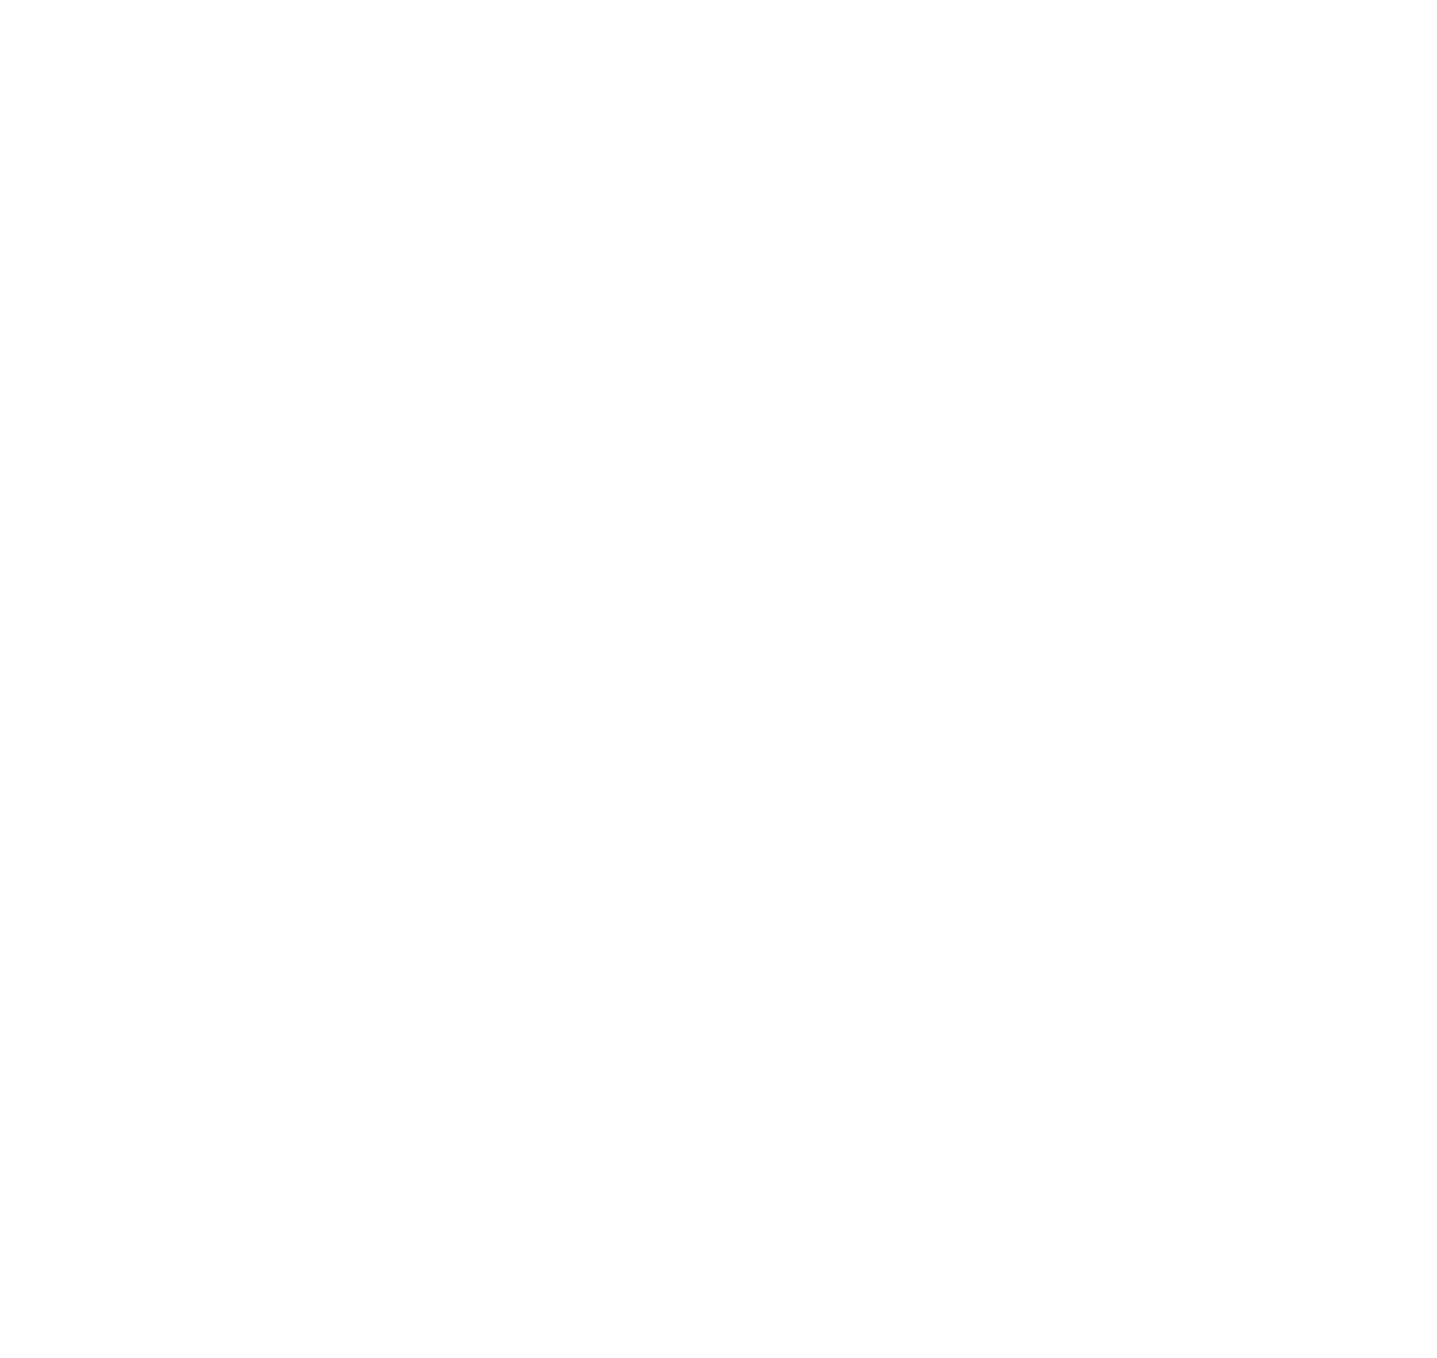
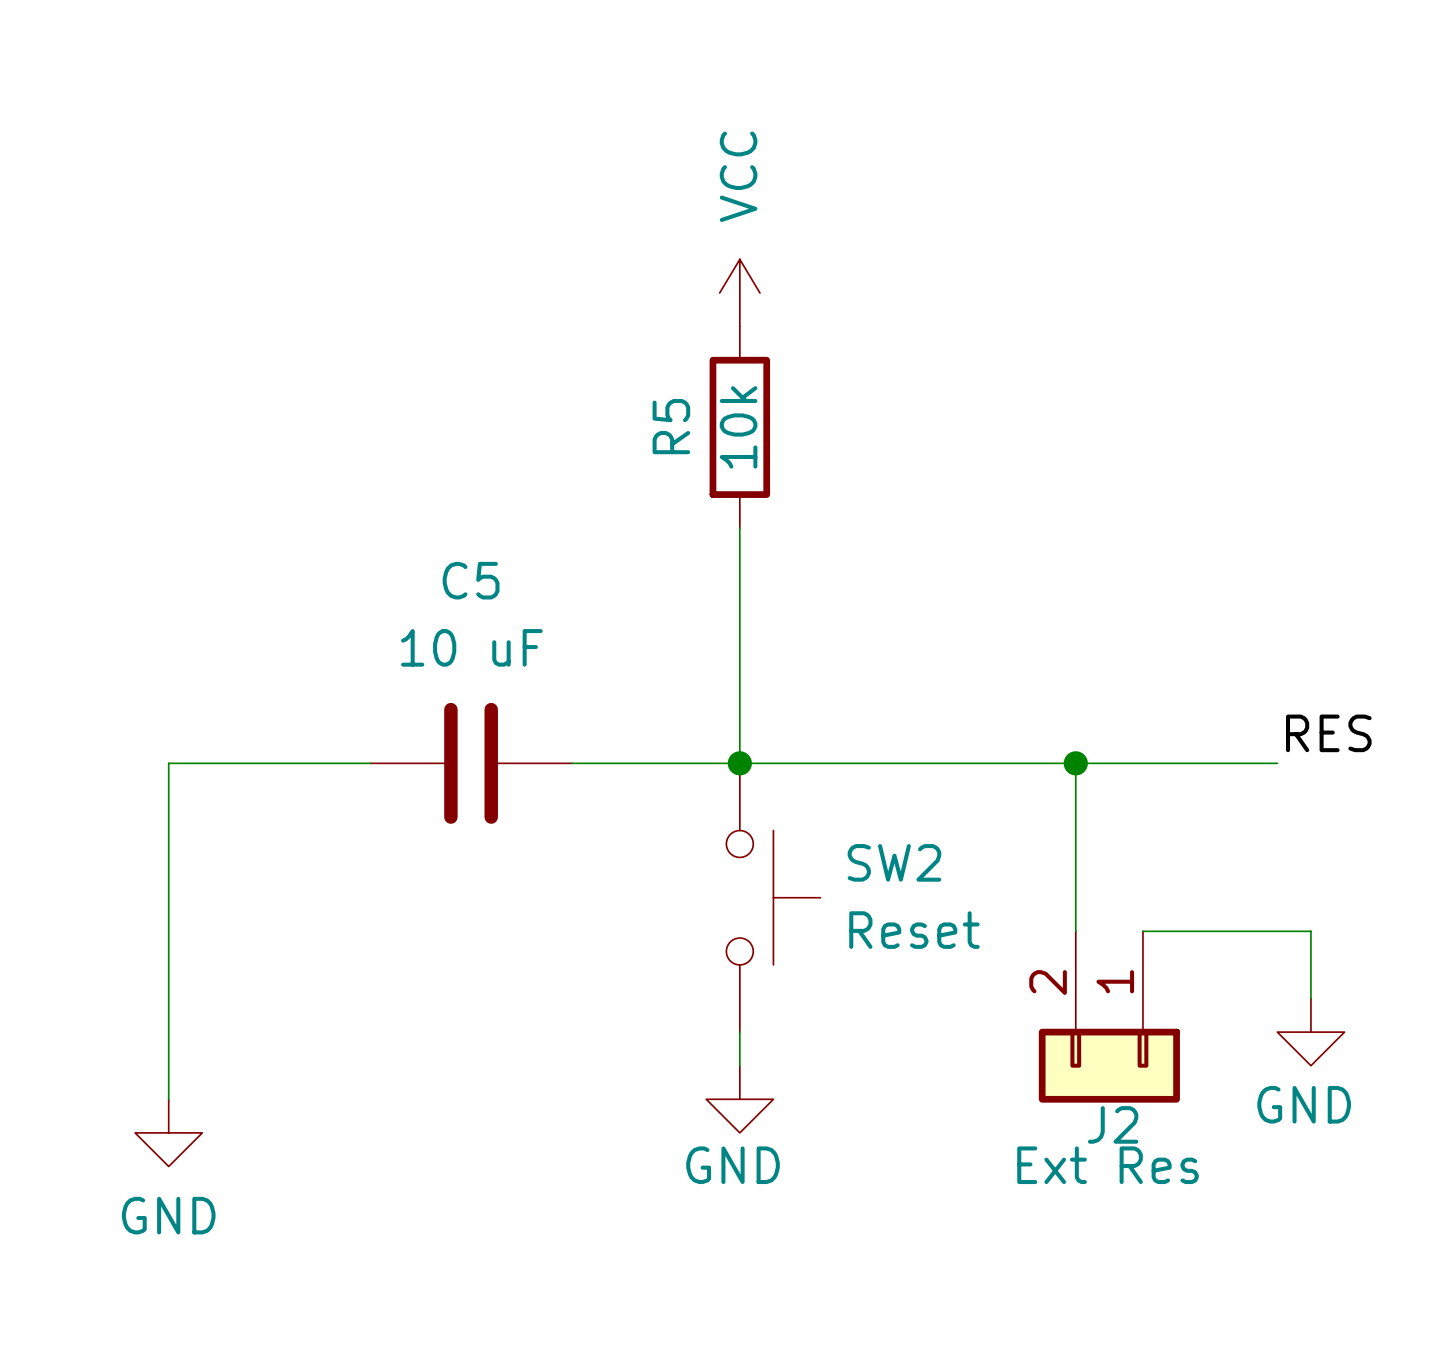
power symbol: none -> VCC (739, 293)
R5: none -> 10k (739, 427)
wire: none -> (739, 528) (739, 763)
label: none -> RES (1328, 733)
wire: none -> (370, 763) (168, 763) (168, 1099)
C5: none -> 10 uF (471, 763)
wire: none -> (571, 763) (1277, 763)
junction: none -> (739, 763)
wire: none -> (1075, 763) (1075, 931)
junction: none -> (1075, 763)
SW2: none -> Reset (773, 897)
wire: none -> (1142, 931) (1310, 931) (1310, 998)
J2: none -> Ext Res (1109, 1016)
wire: none -> (739, 1032) (739, 1065)
power symbol: none -> GND (1310, 1032)
power symbol: none -> GND (739, 1099)
power symbol: none -> GND (168, 1132)

